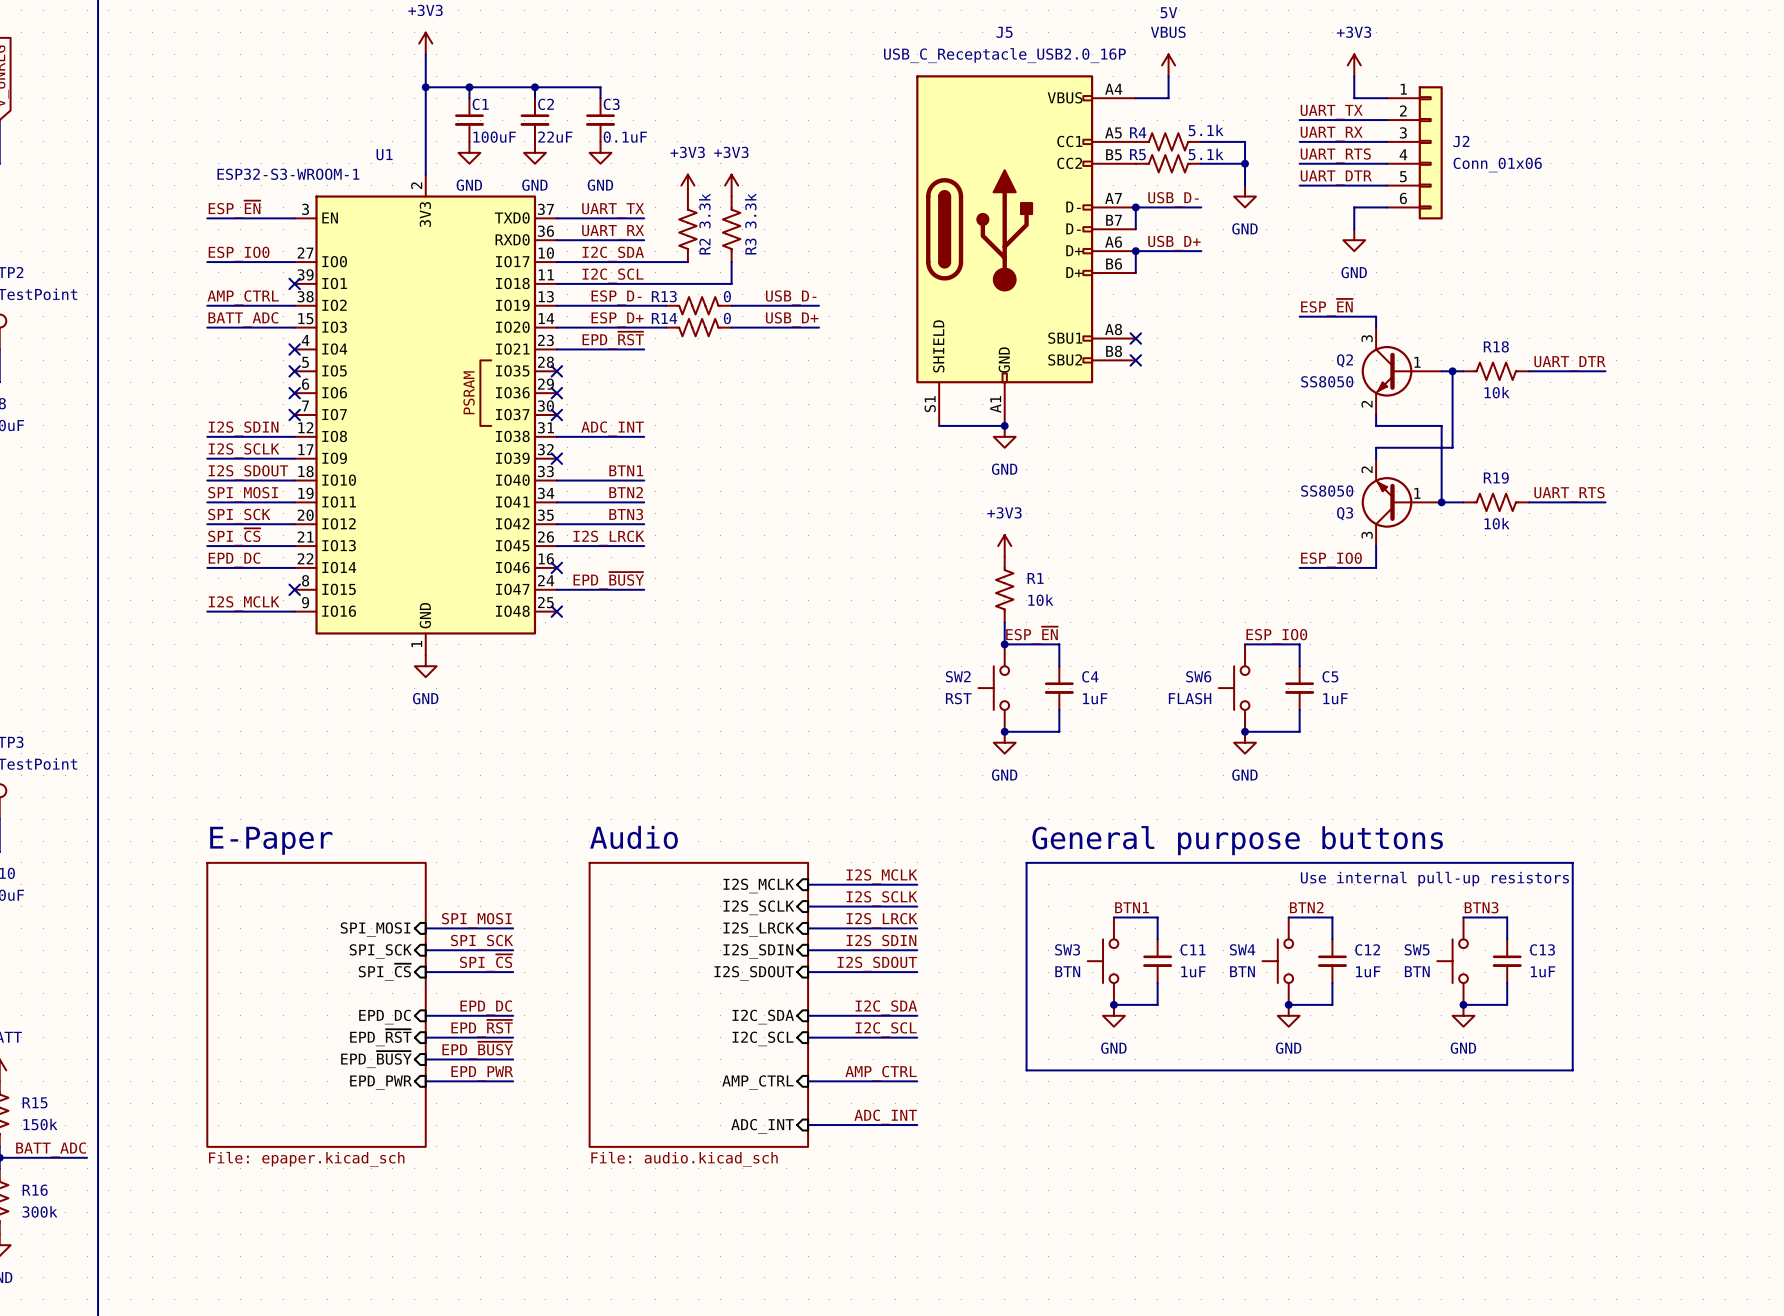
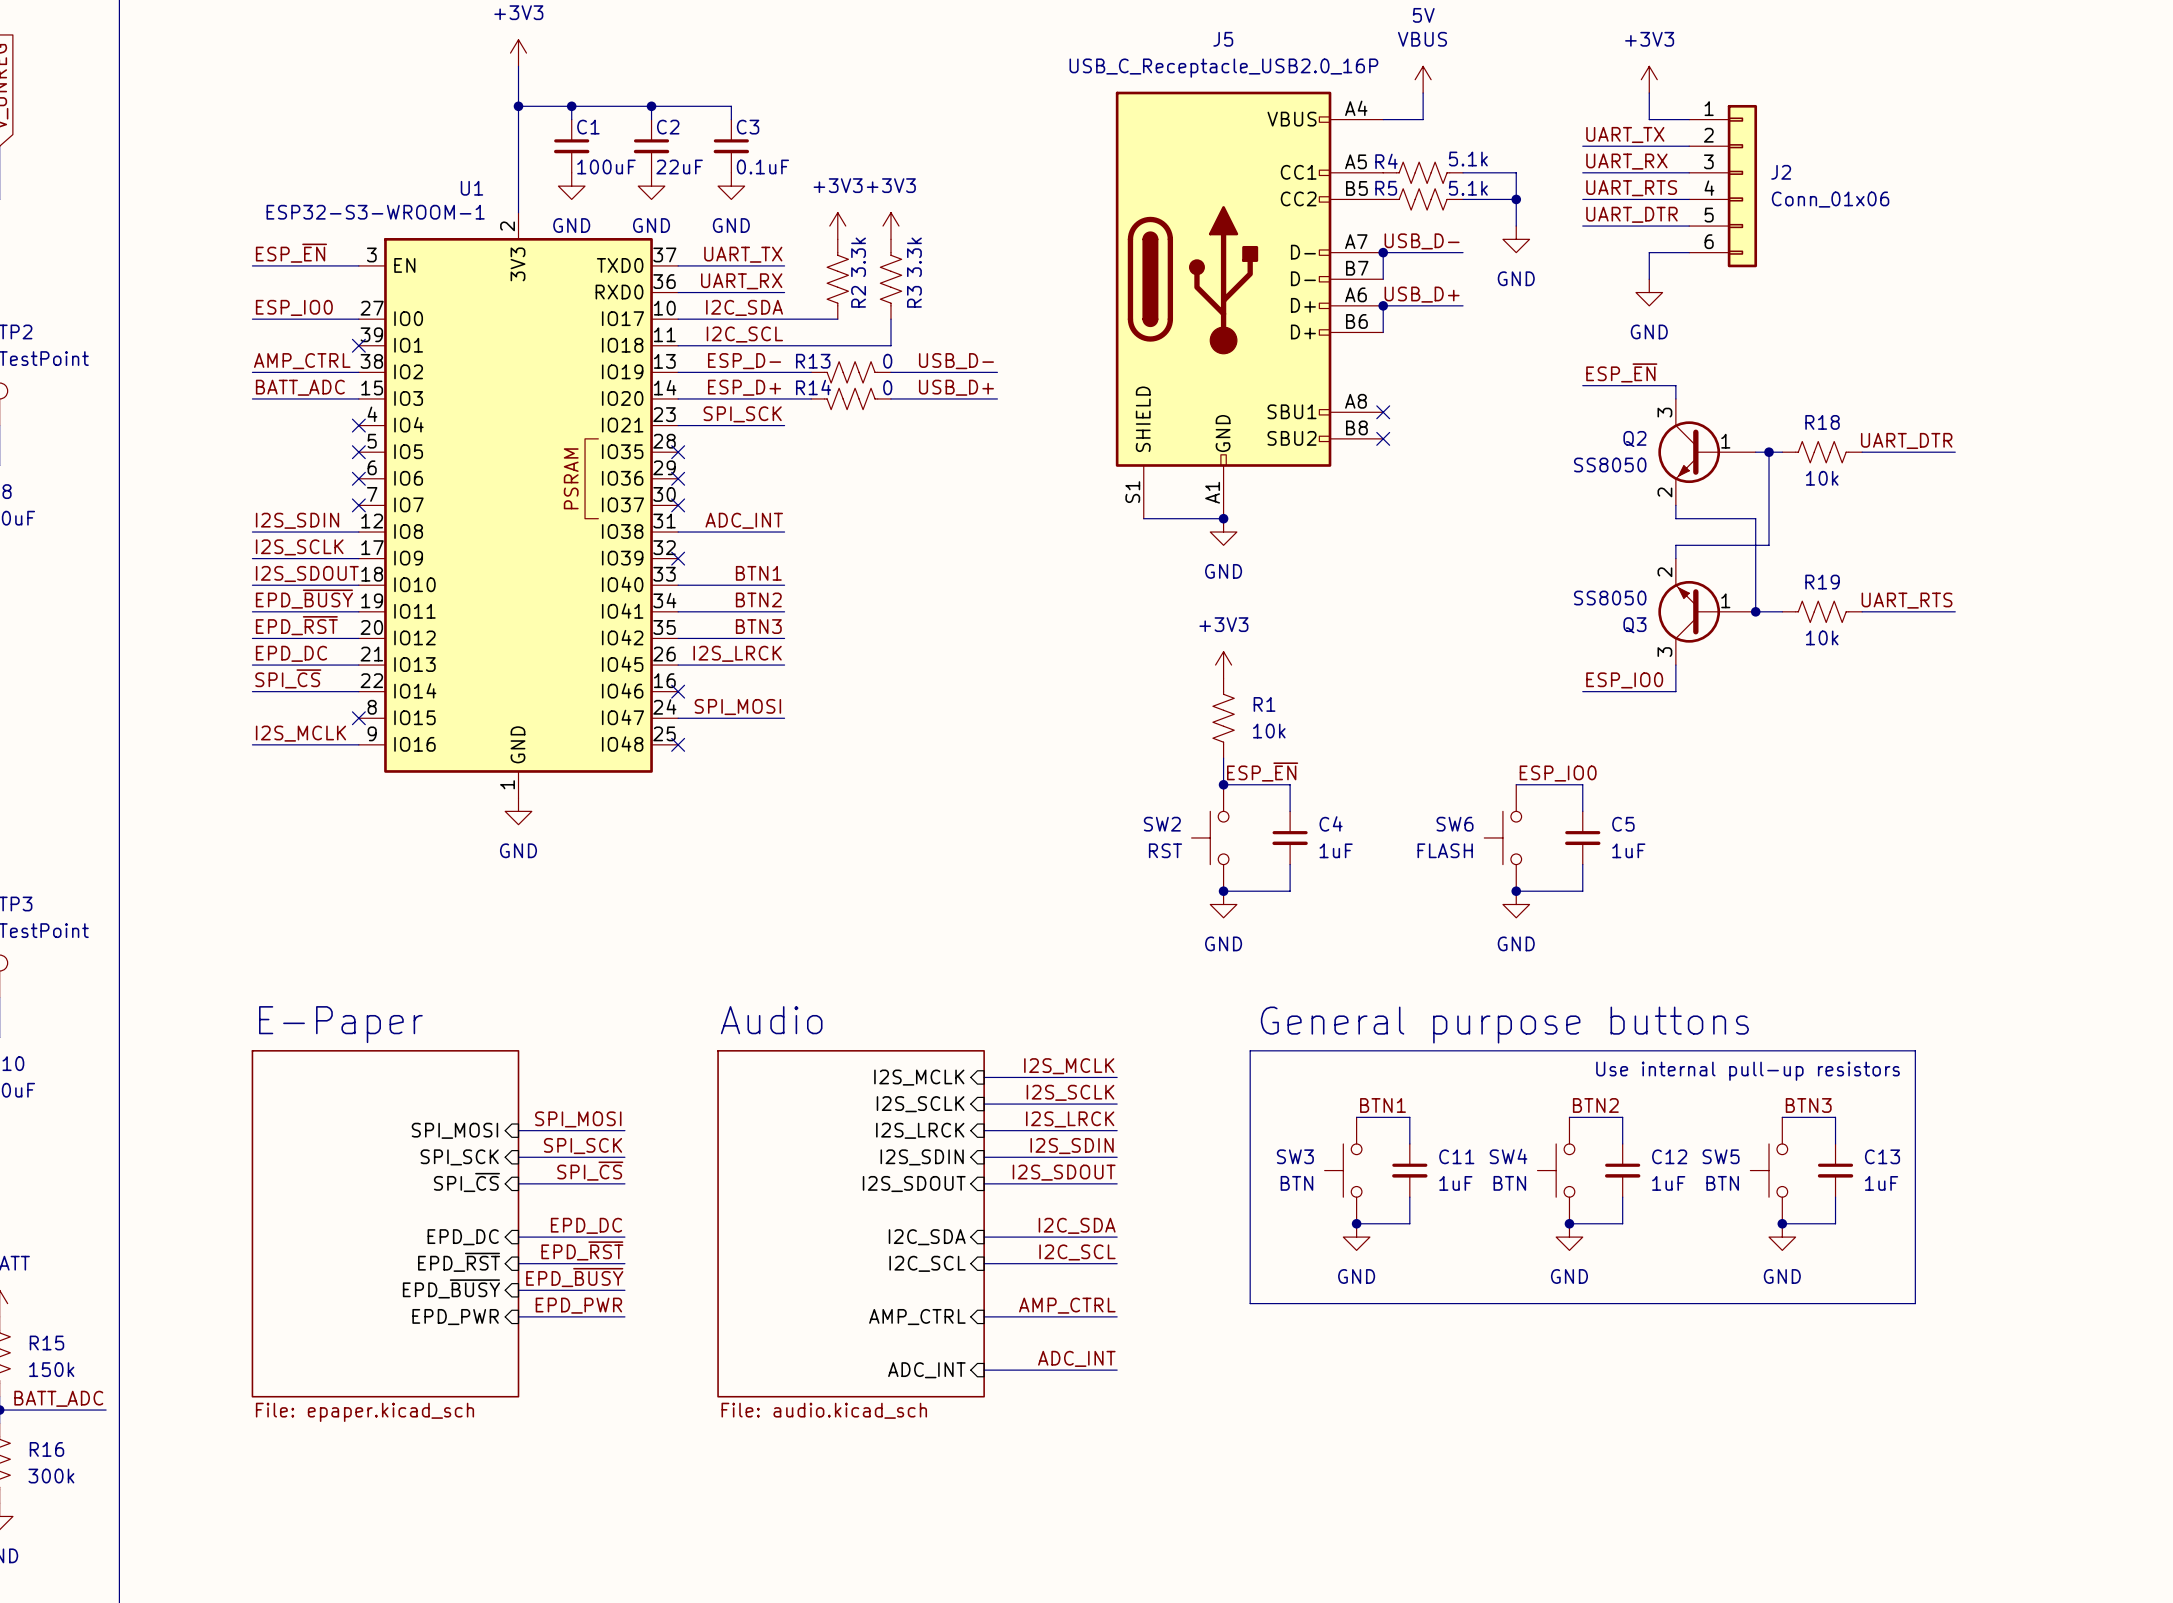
label: EPD_~{RST} (613, 340) -> SPI_SCK (742, 414)
label: SPI_MOSI (243, 494) -> EPD_~{BUSY} (304, 599)
label: SPI_SCK (239, 516) -> EPD_~{RST} (296, 625)
label: SPI_~{CS} (234, 536) -> EPD_DC (291, 653)
label: EPD_DC (234, 559) -> SPI_~{CS} (288, 678)
label: EPD_~{BUSY} (608, 580) -> SPI_MOSI (737, 707)

